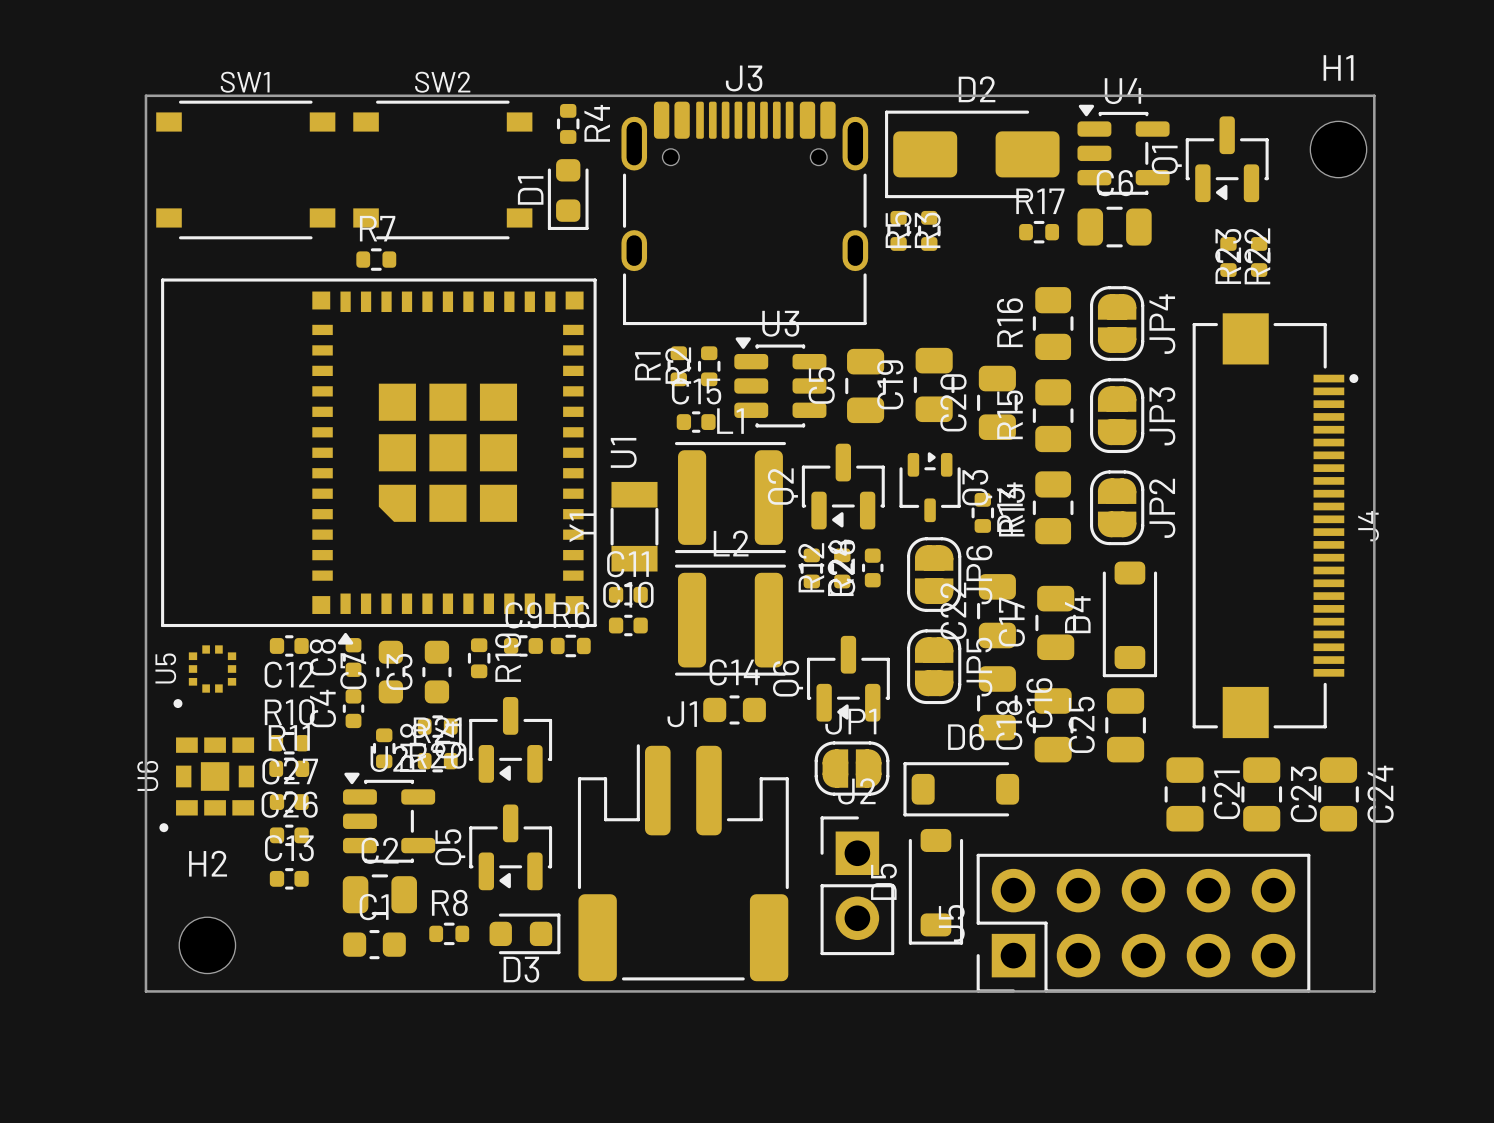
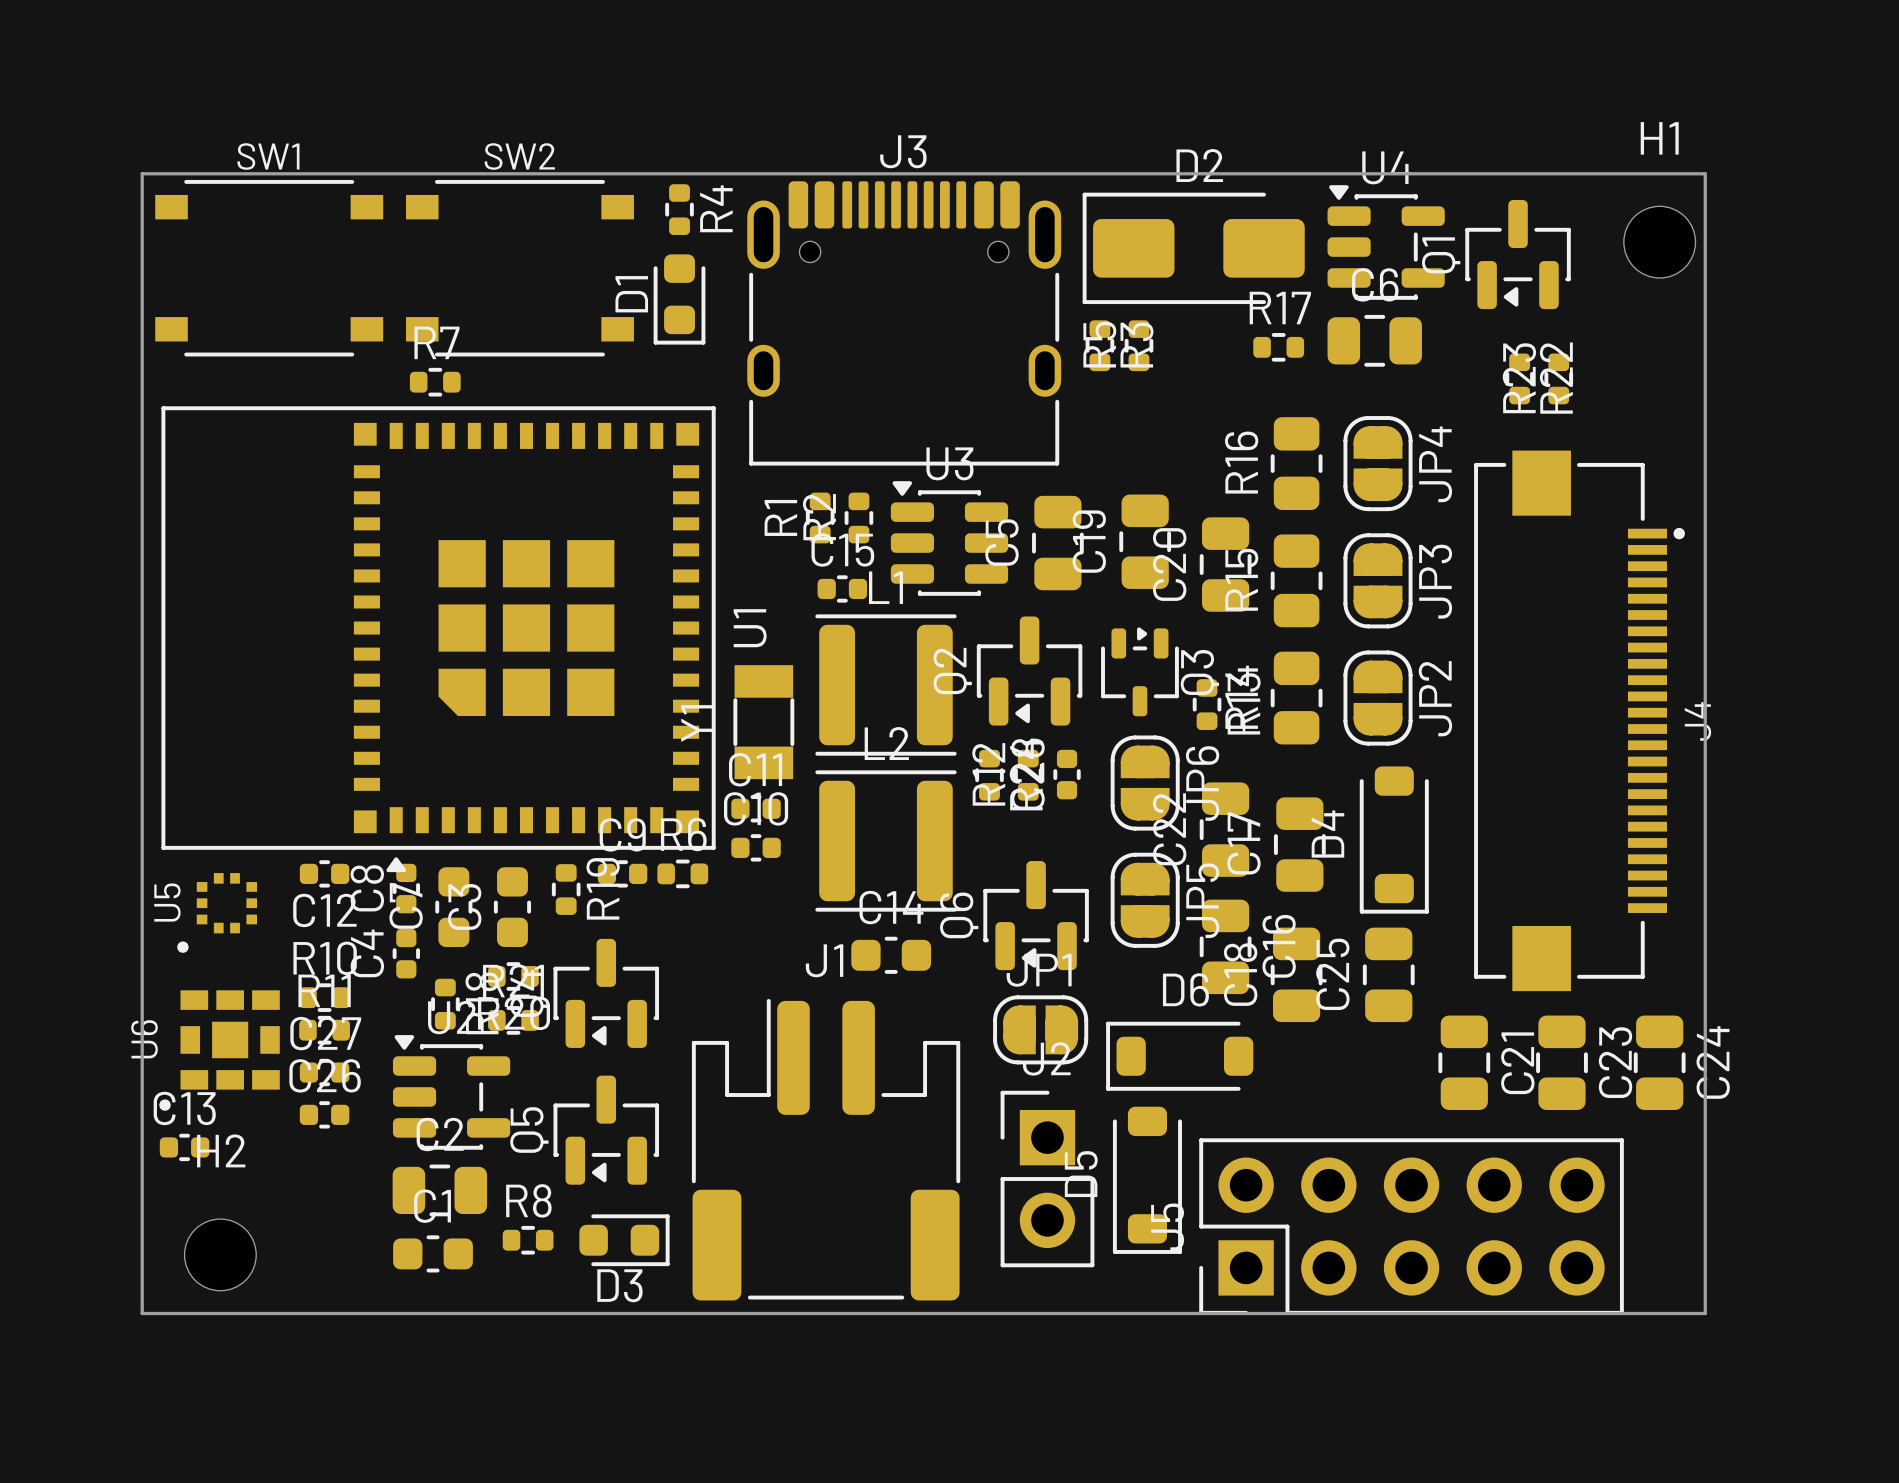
C13 position: (289, 878) -> (184, 1147)

